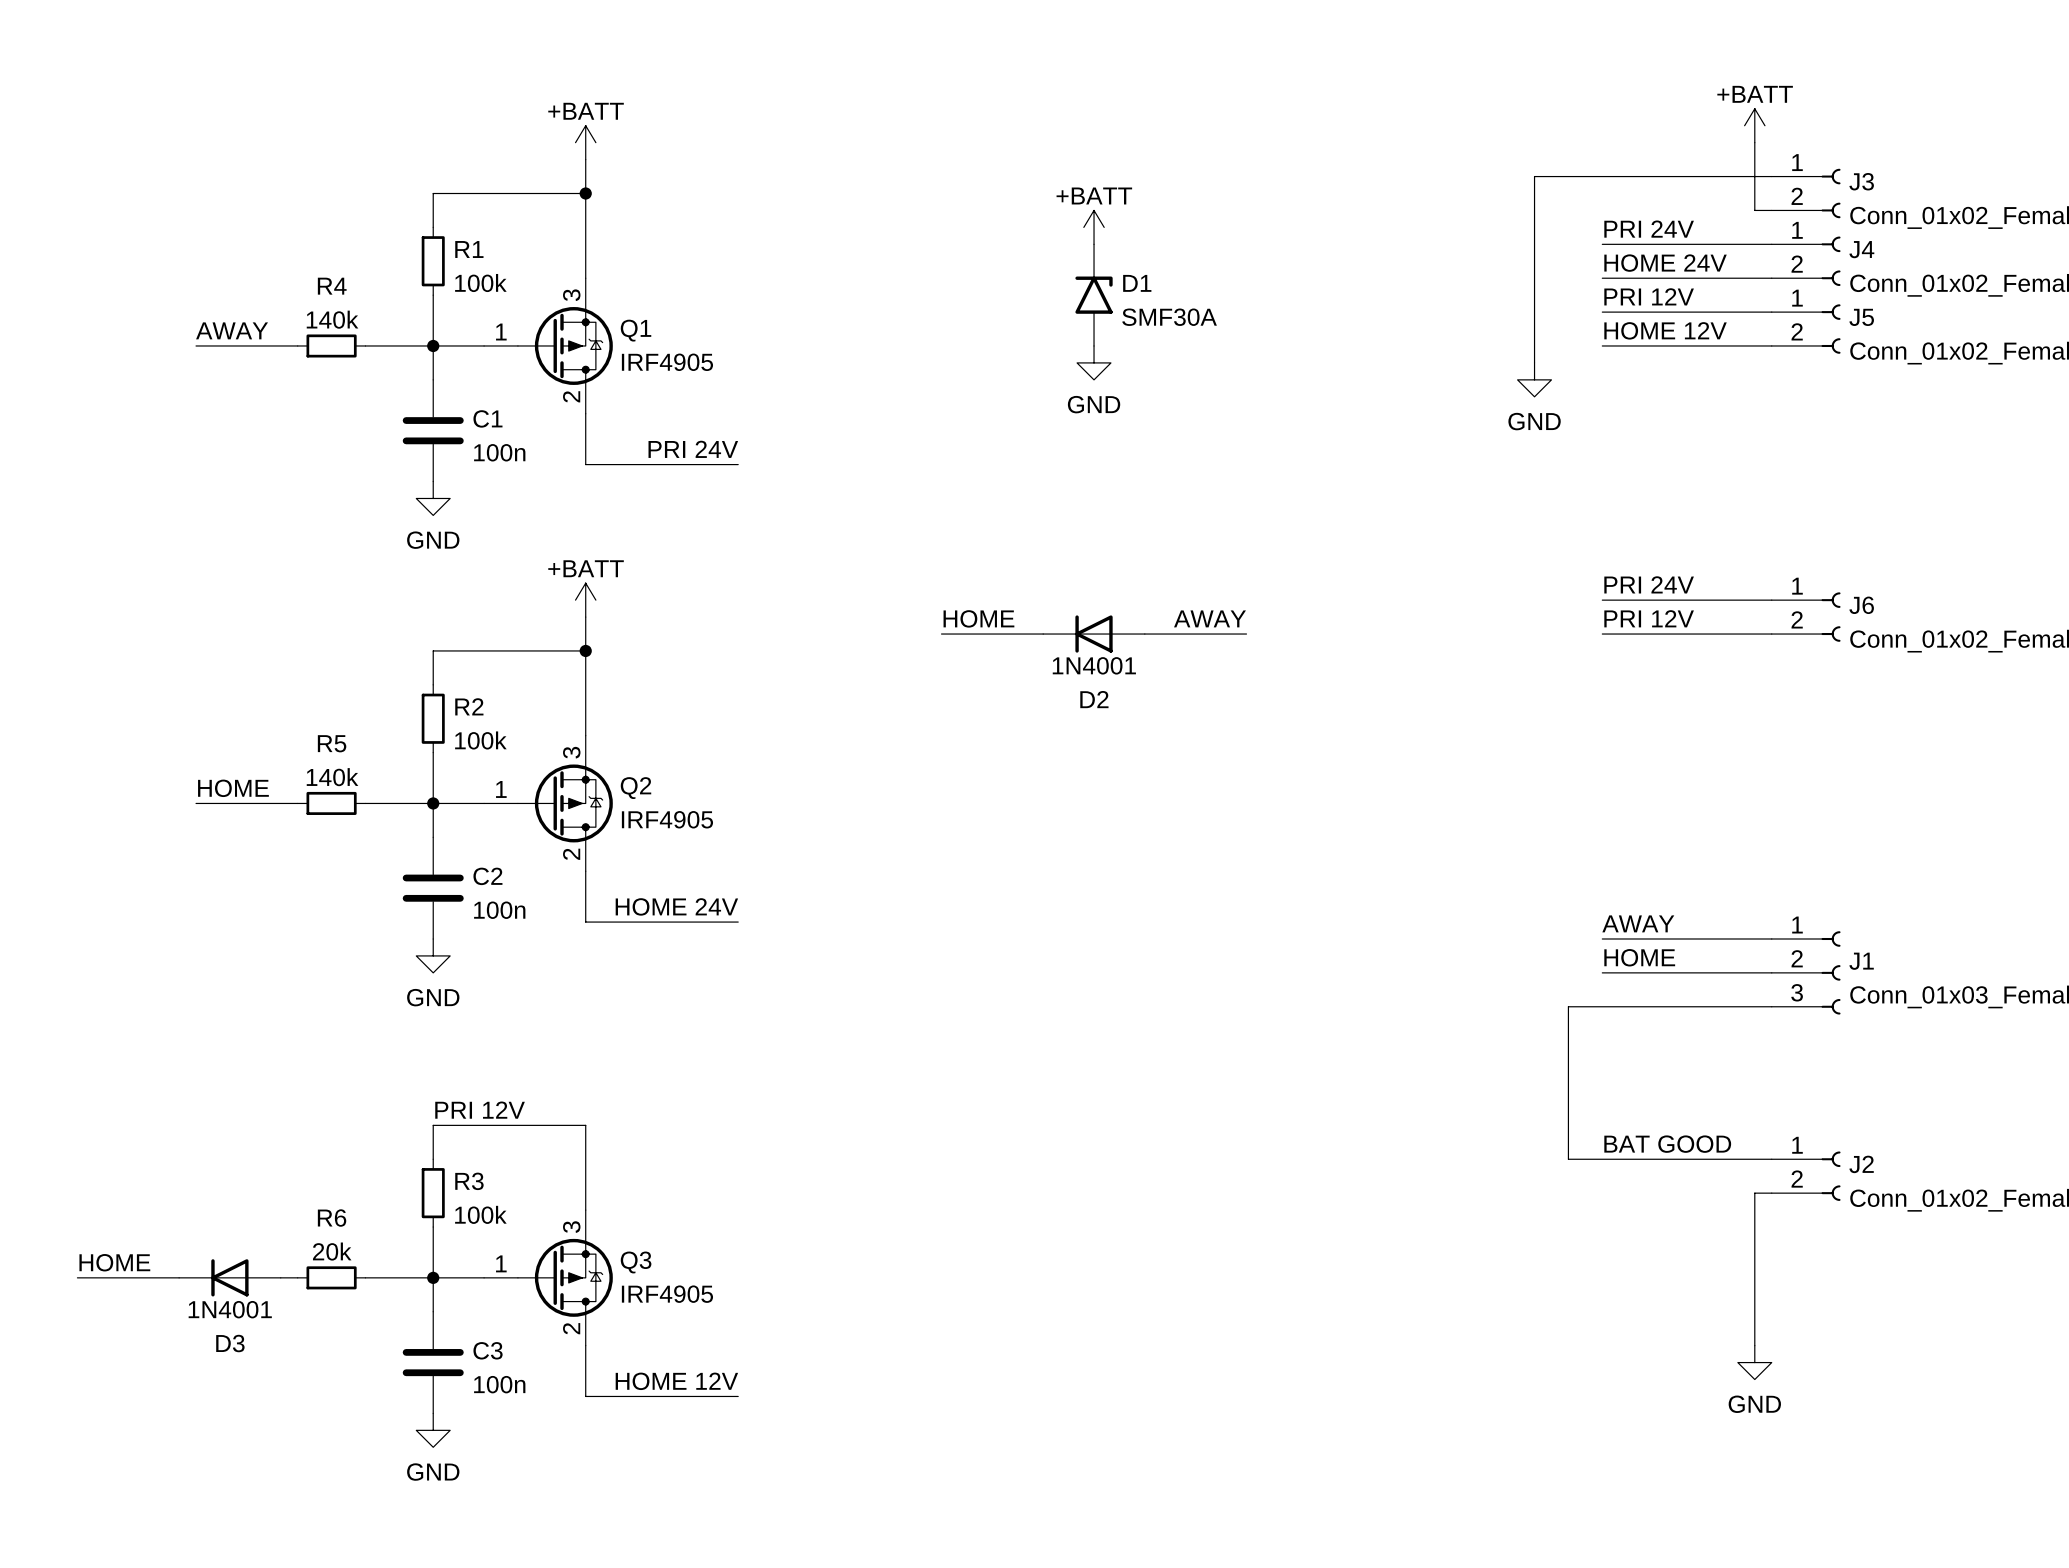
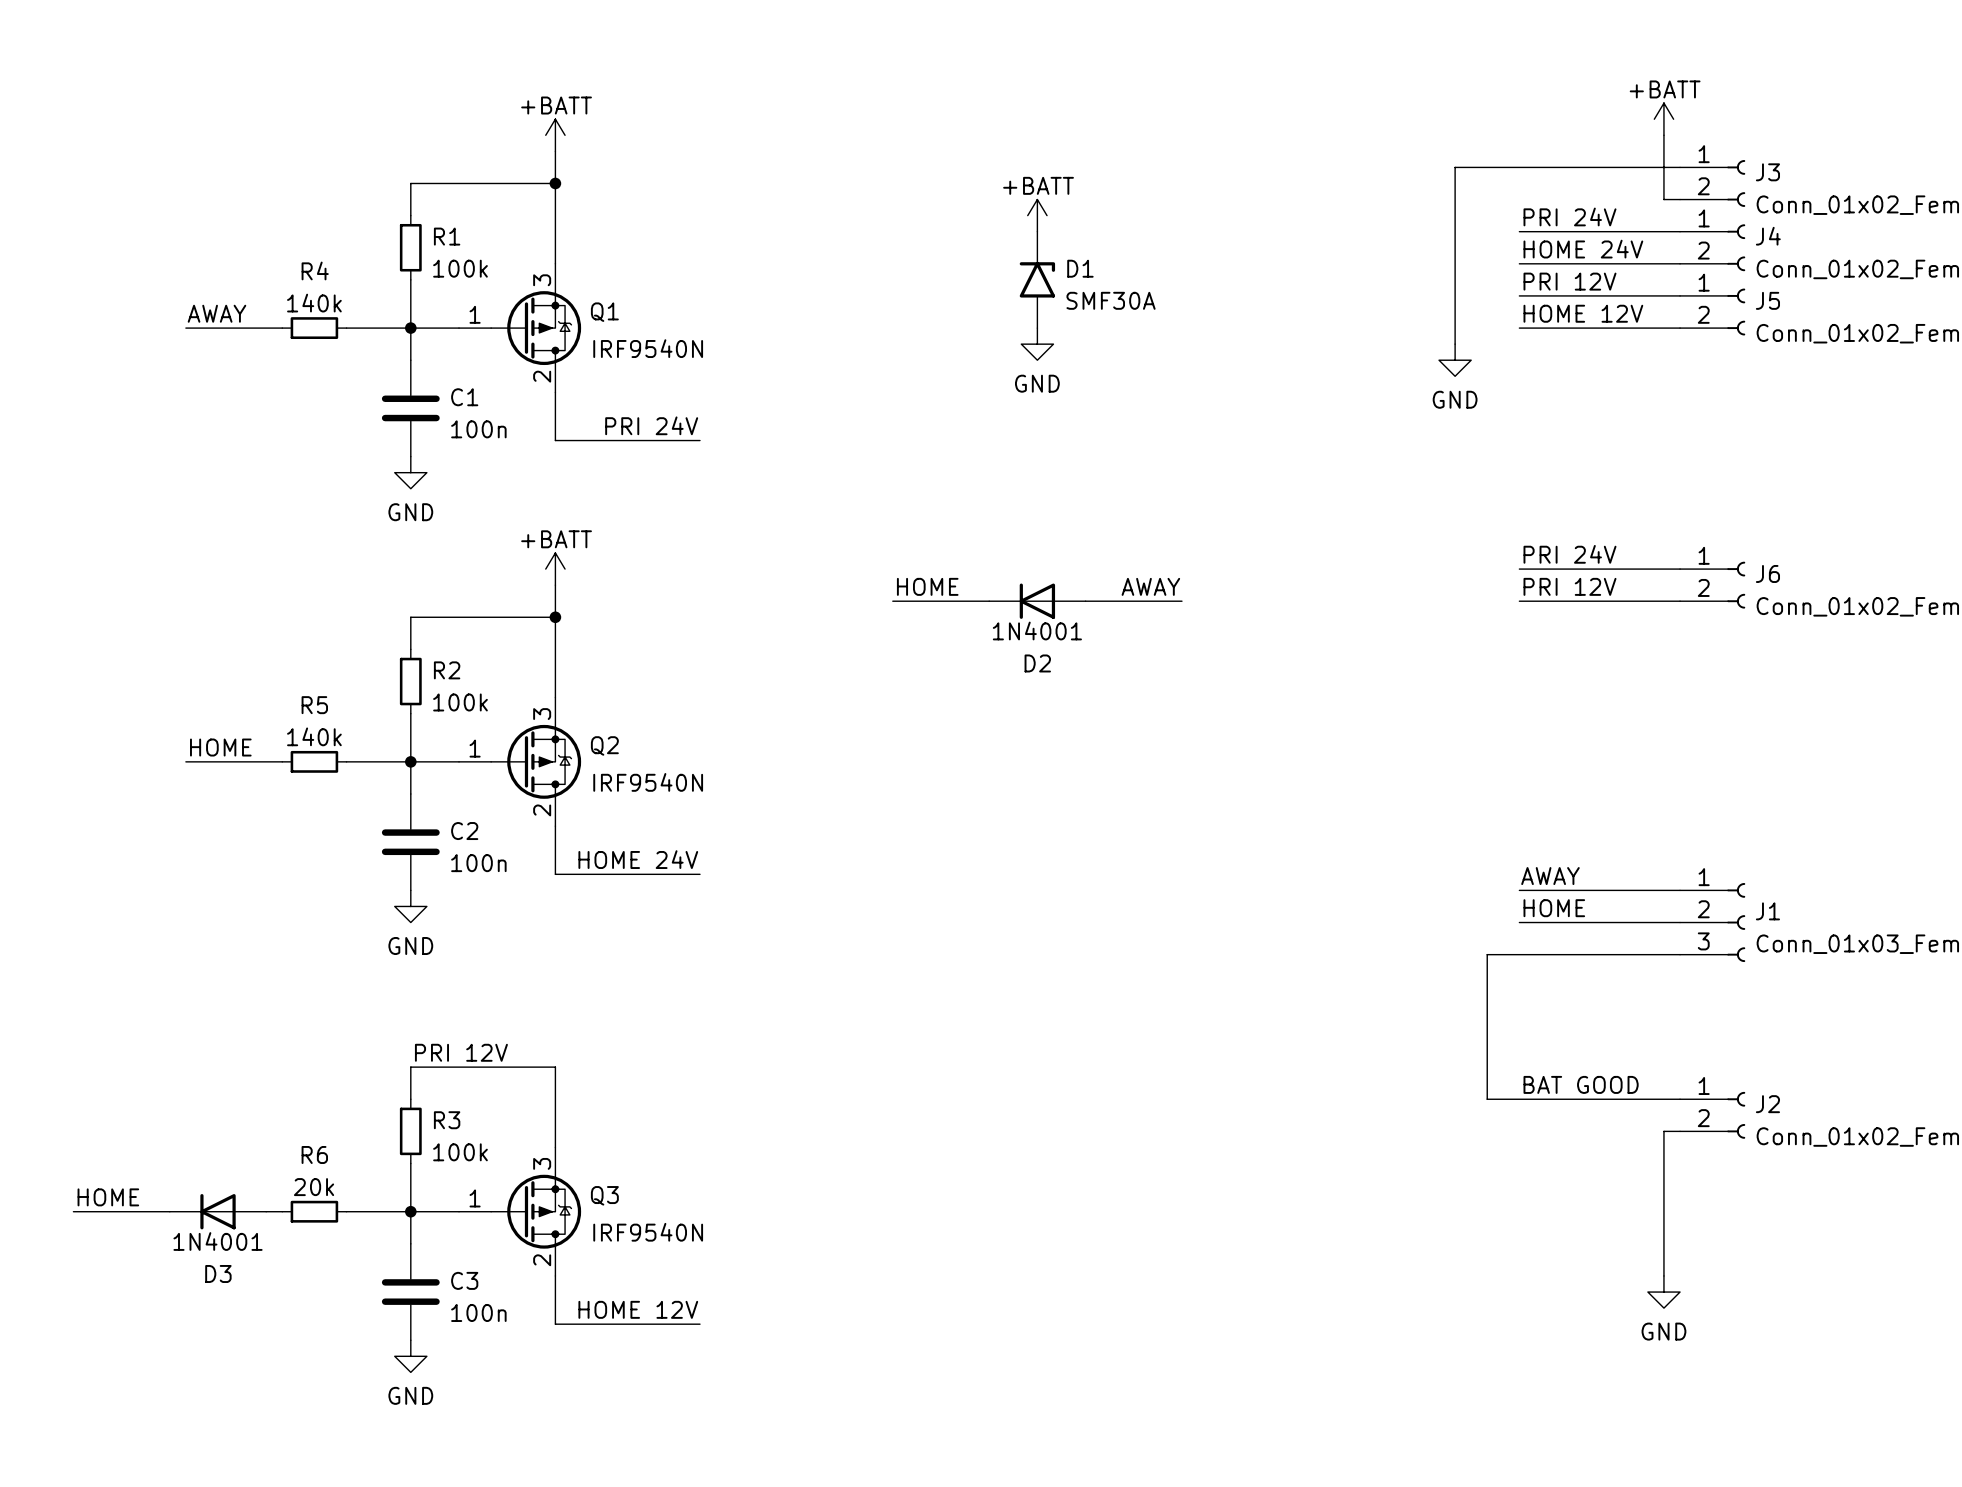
Q1 value: IRF4905 (667, 362) -> IRF9540N (648, 348)
Q2 value: IRF4905 (667, 819) -> IRF9540N (648, 782)
Q3 value: IRF4905 (667, 1294) -> IRF9540N (648, 1232)

